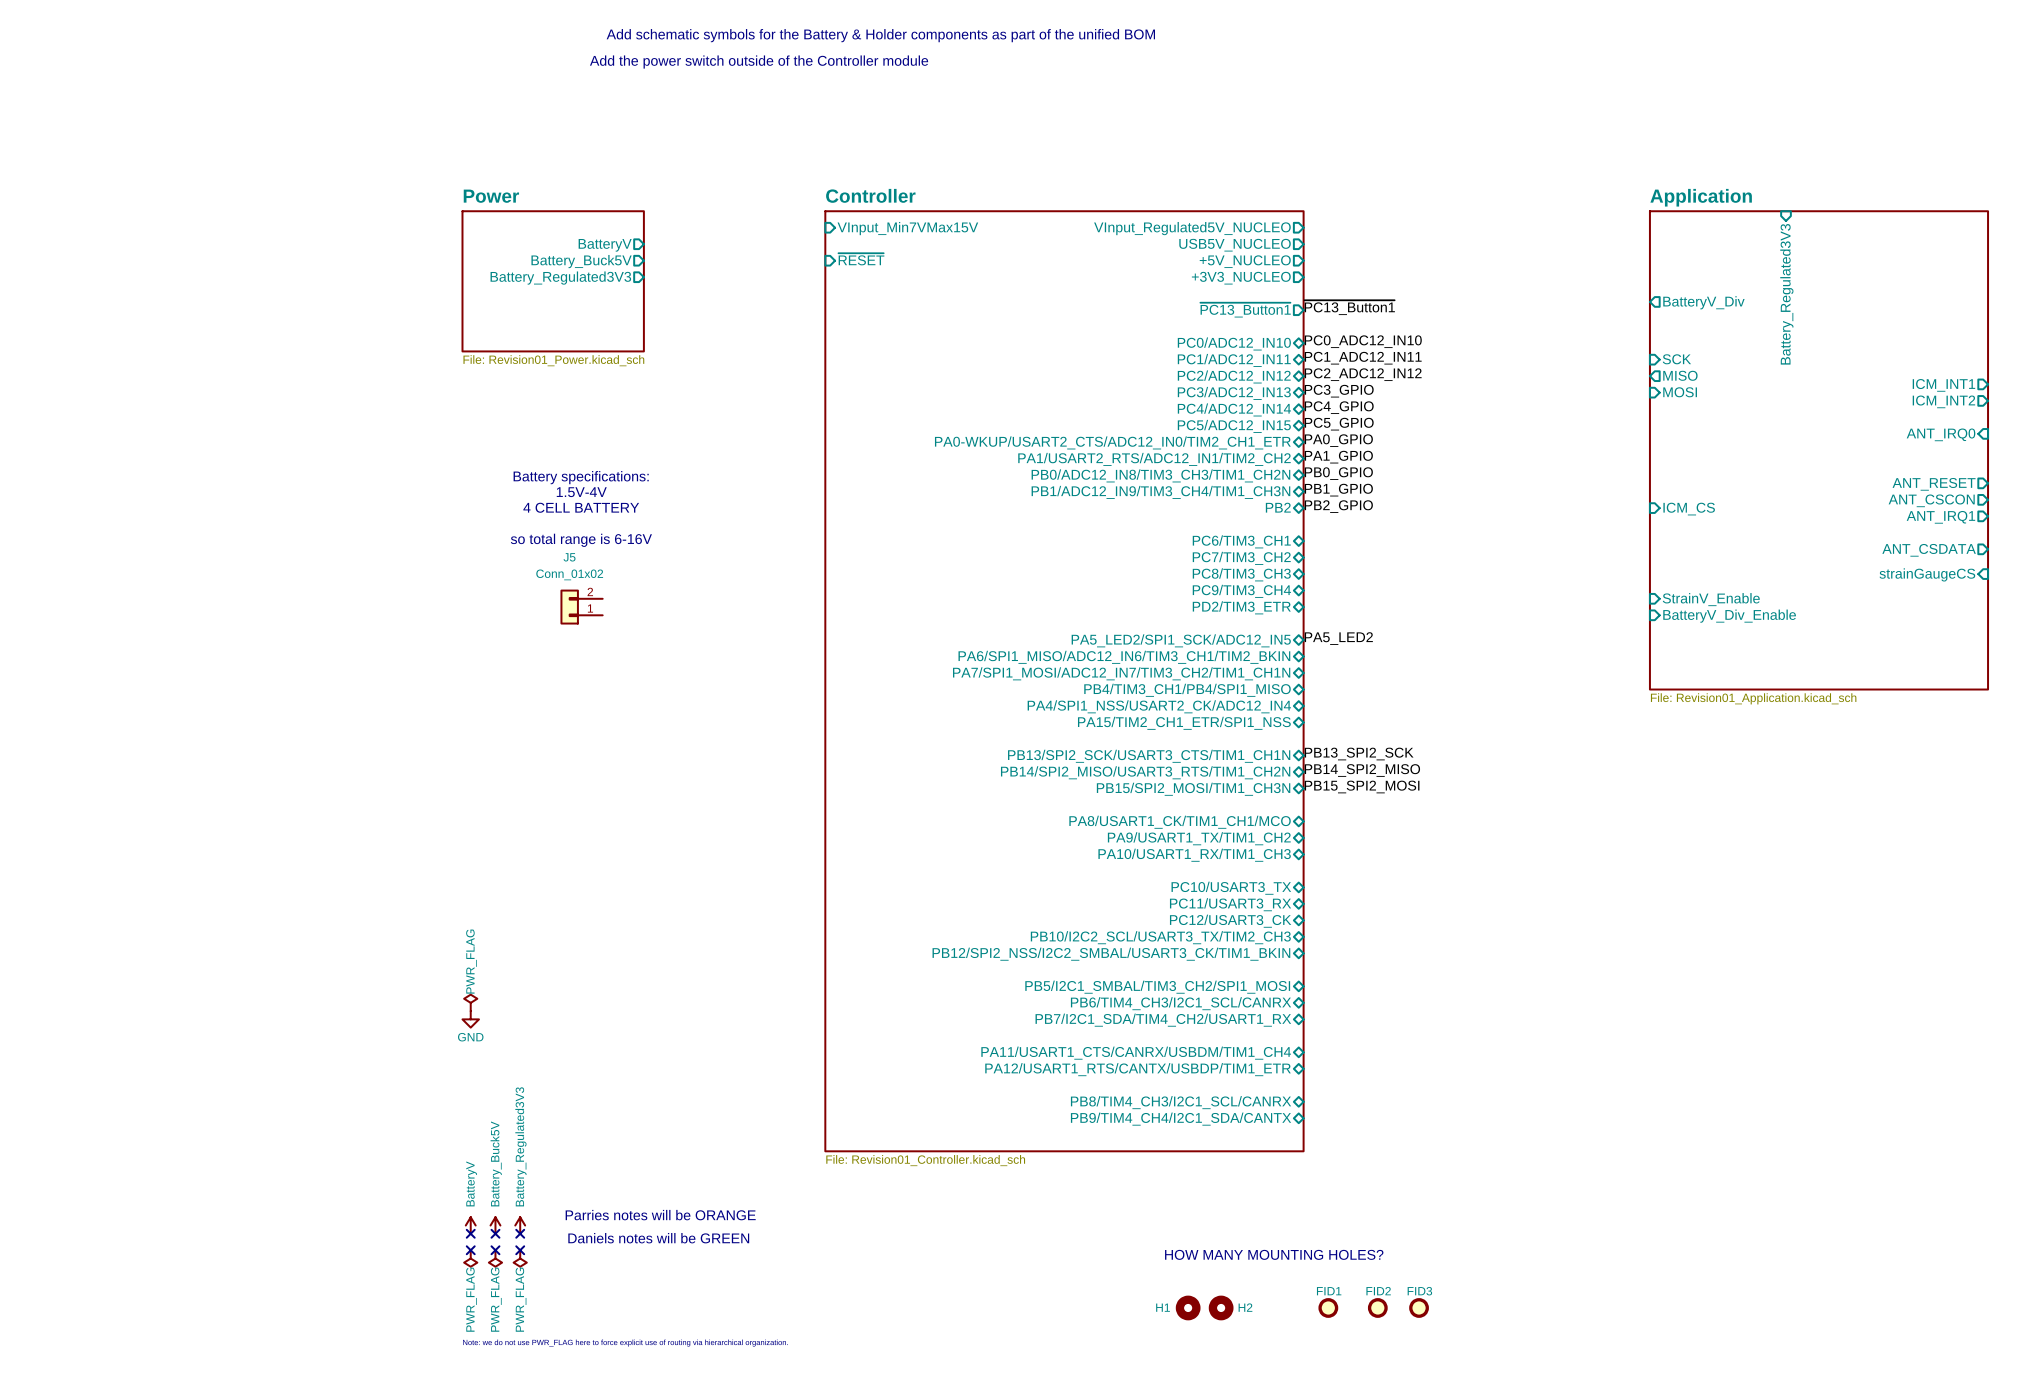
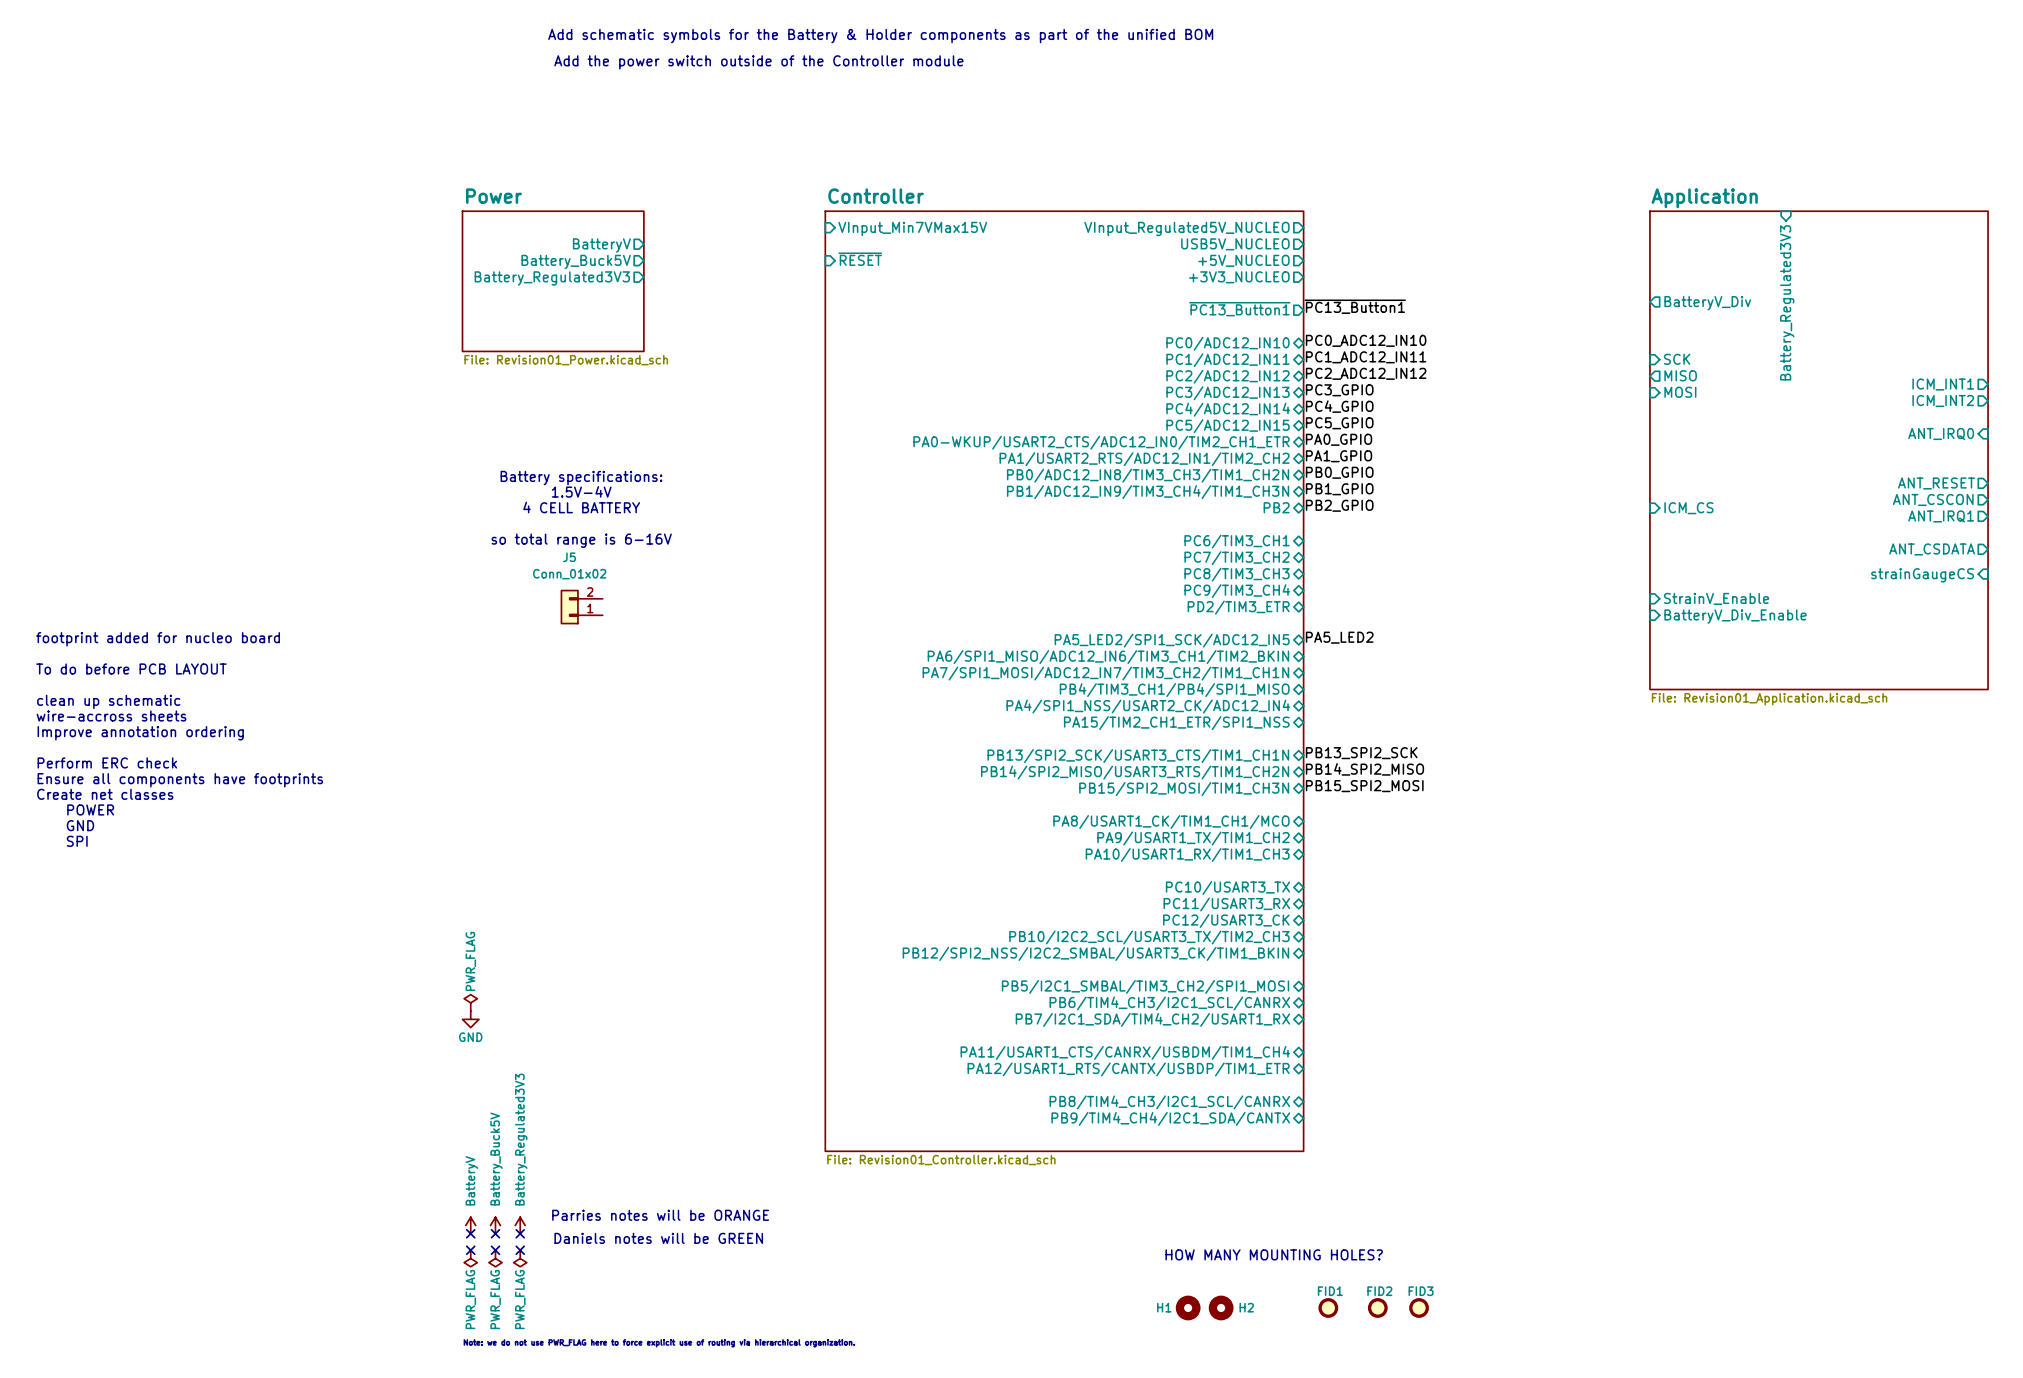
text: none -> footprint added for nucleo board (158, 639)
text: none -> To do before PCB LAYOUT (131, 668)
text: none -> clean up schematic (108, 701)
text: none -> wire-accross sheets (111, 715)
text: none -> Improve annotation ordering (140, 733)
text: none -> Perform ERC check (107, 762)
text: none -> Ensure all components have footprints (180, 780)
text: none -> Create net classes (105, 794)
text: none -> POWER (90, 809)
text: none -> GND (80, 825)
text: none -> SPI (77, 841)

